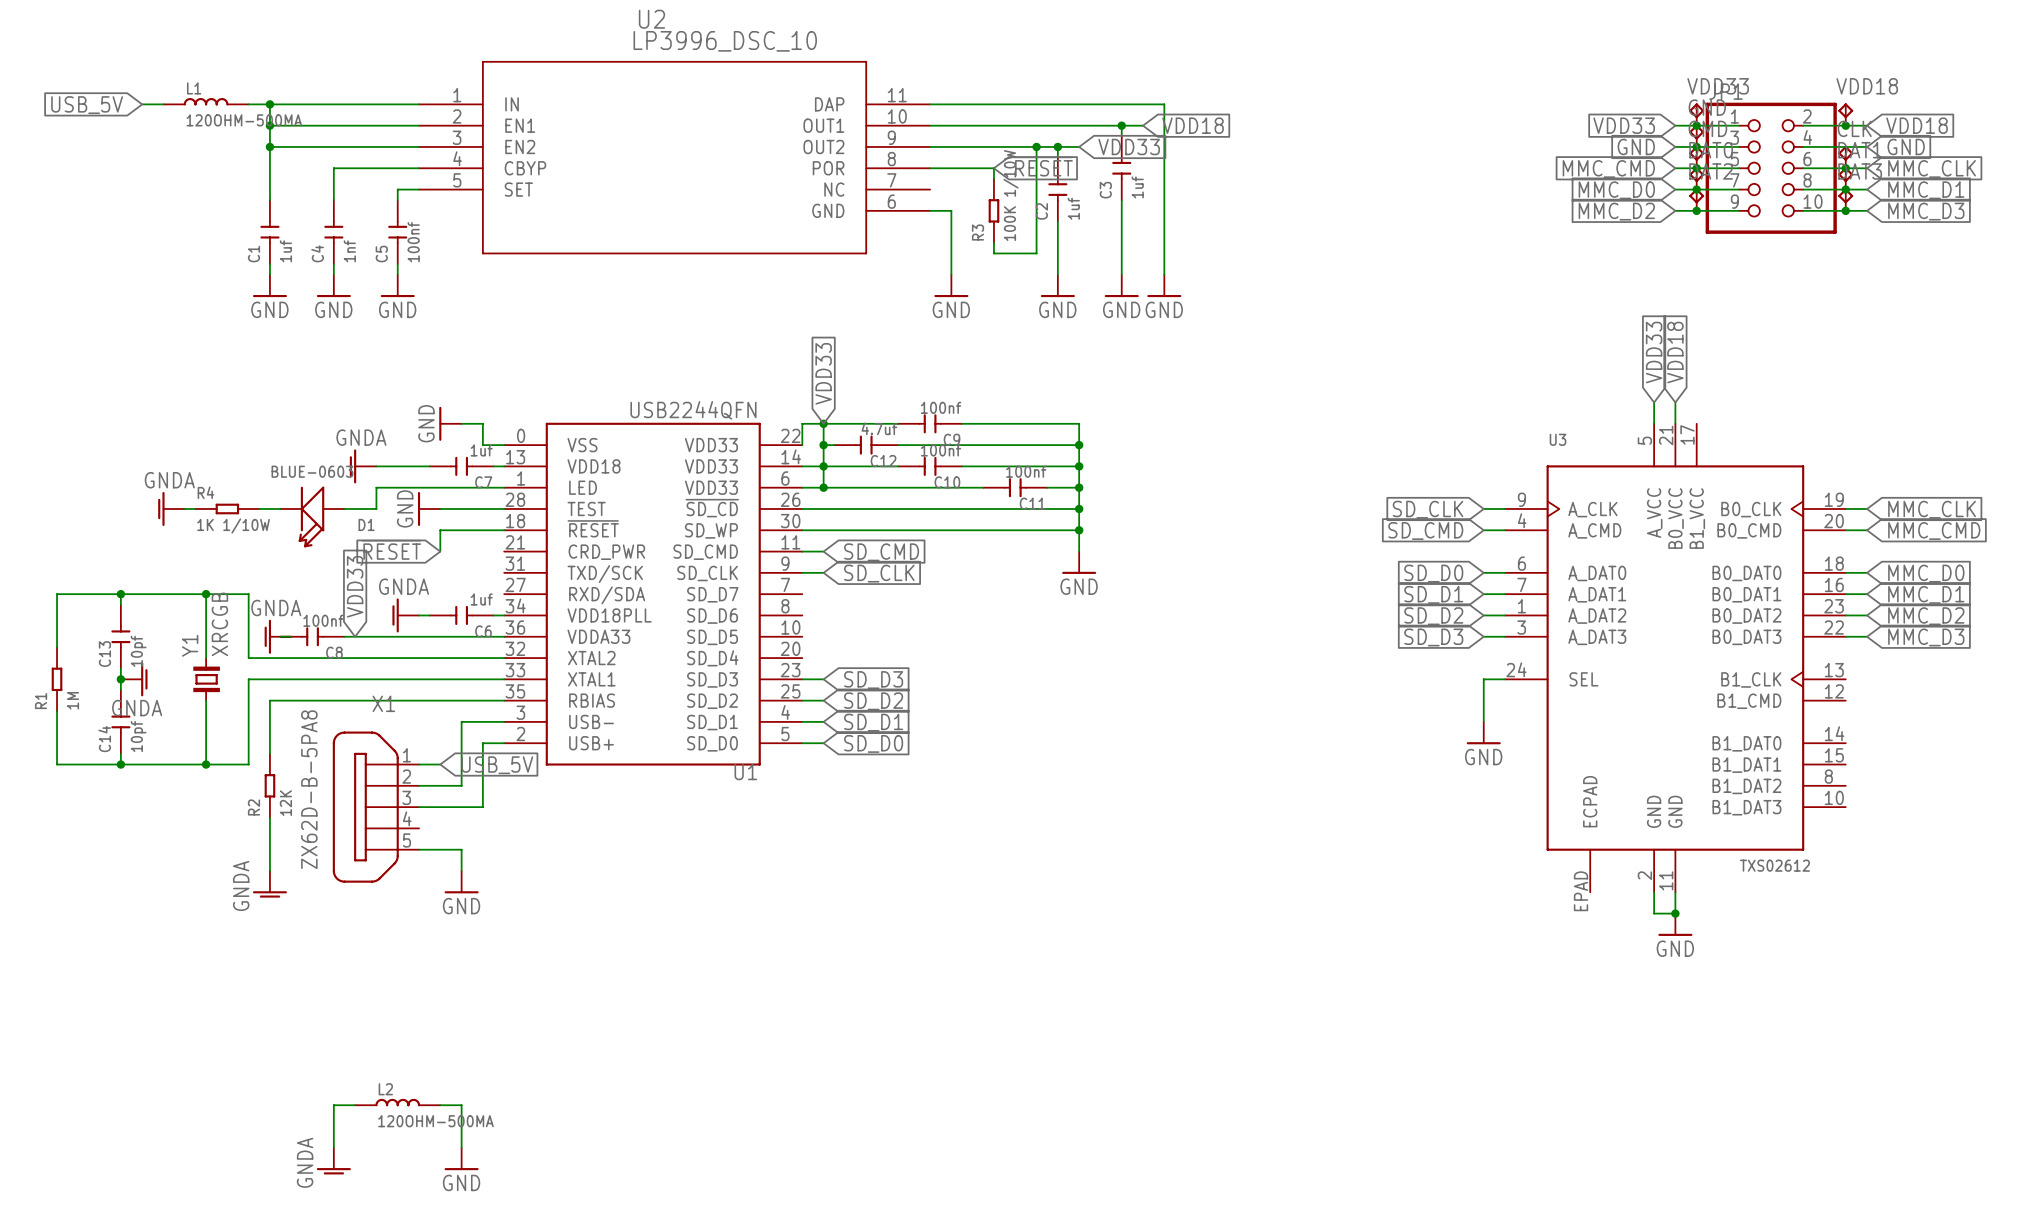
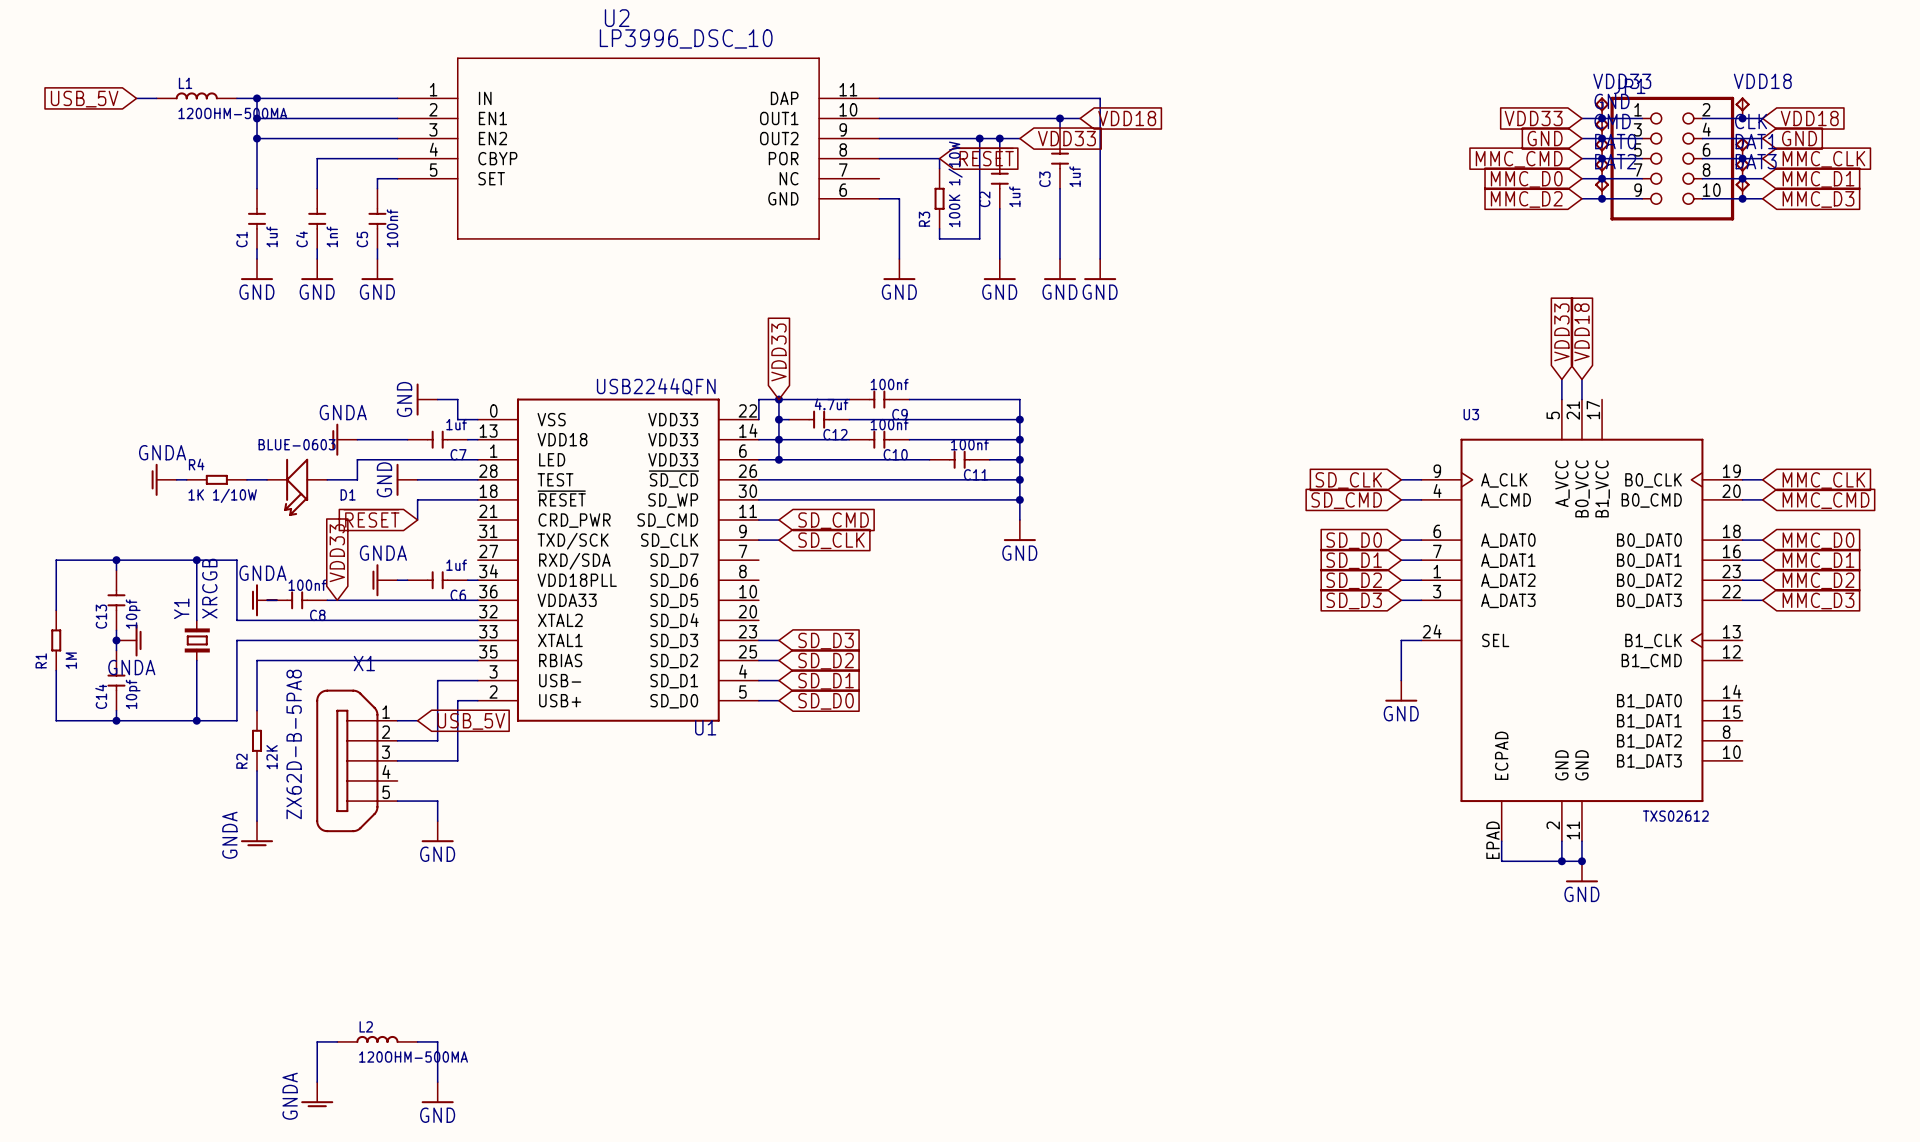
wire: none -> (1501, 841) (1501, 861) (1561, 861)
junction: none -> (1561, 861)

